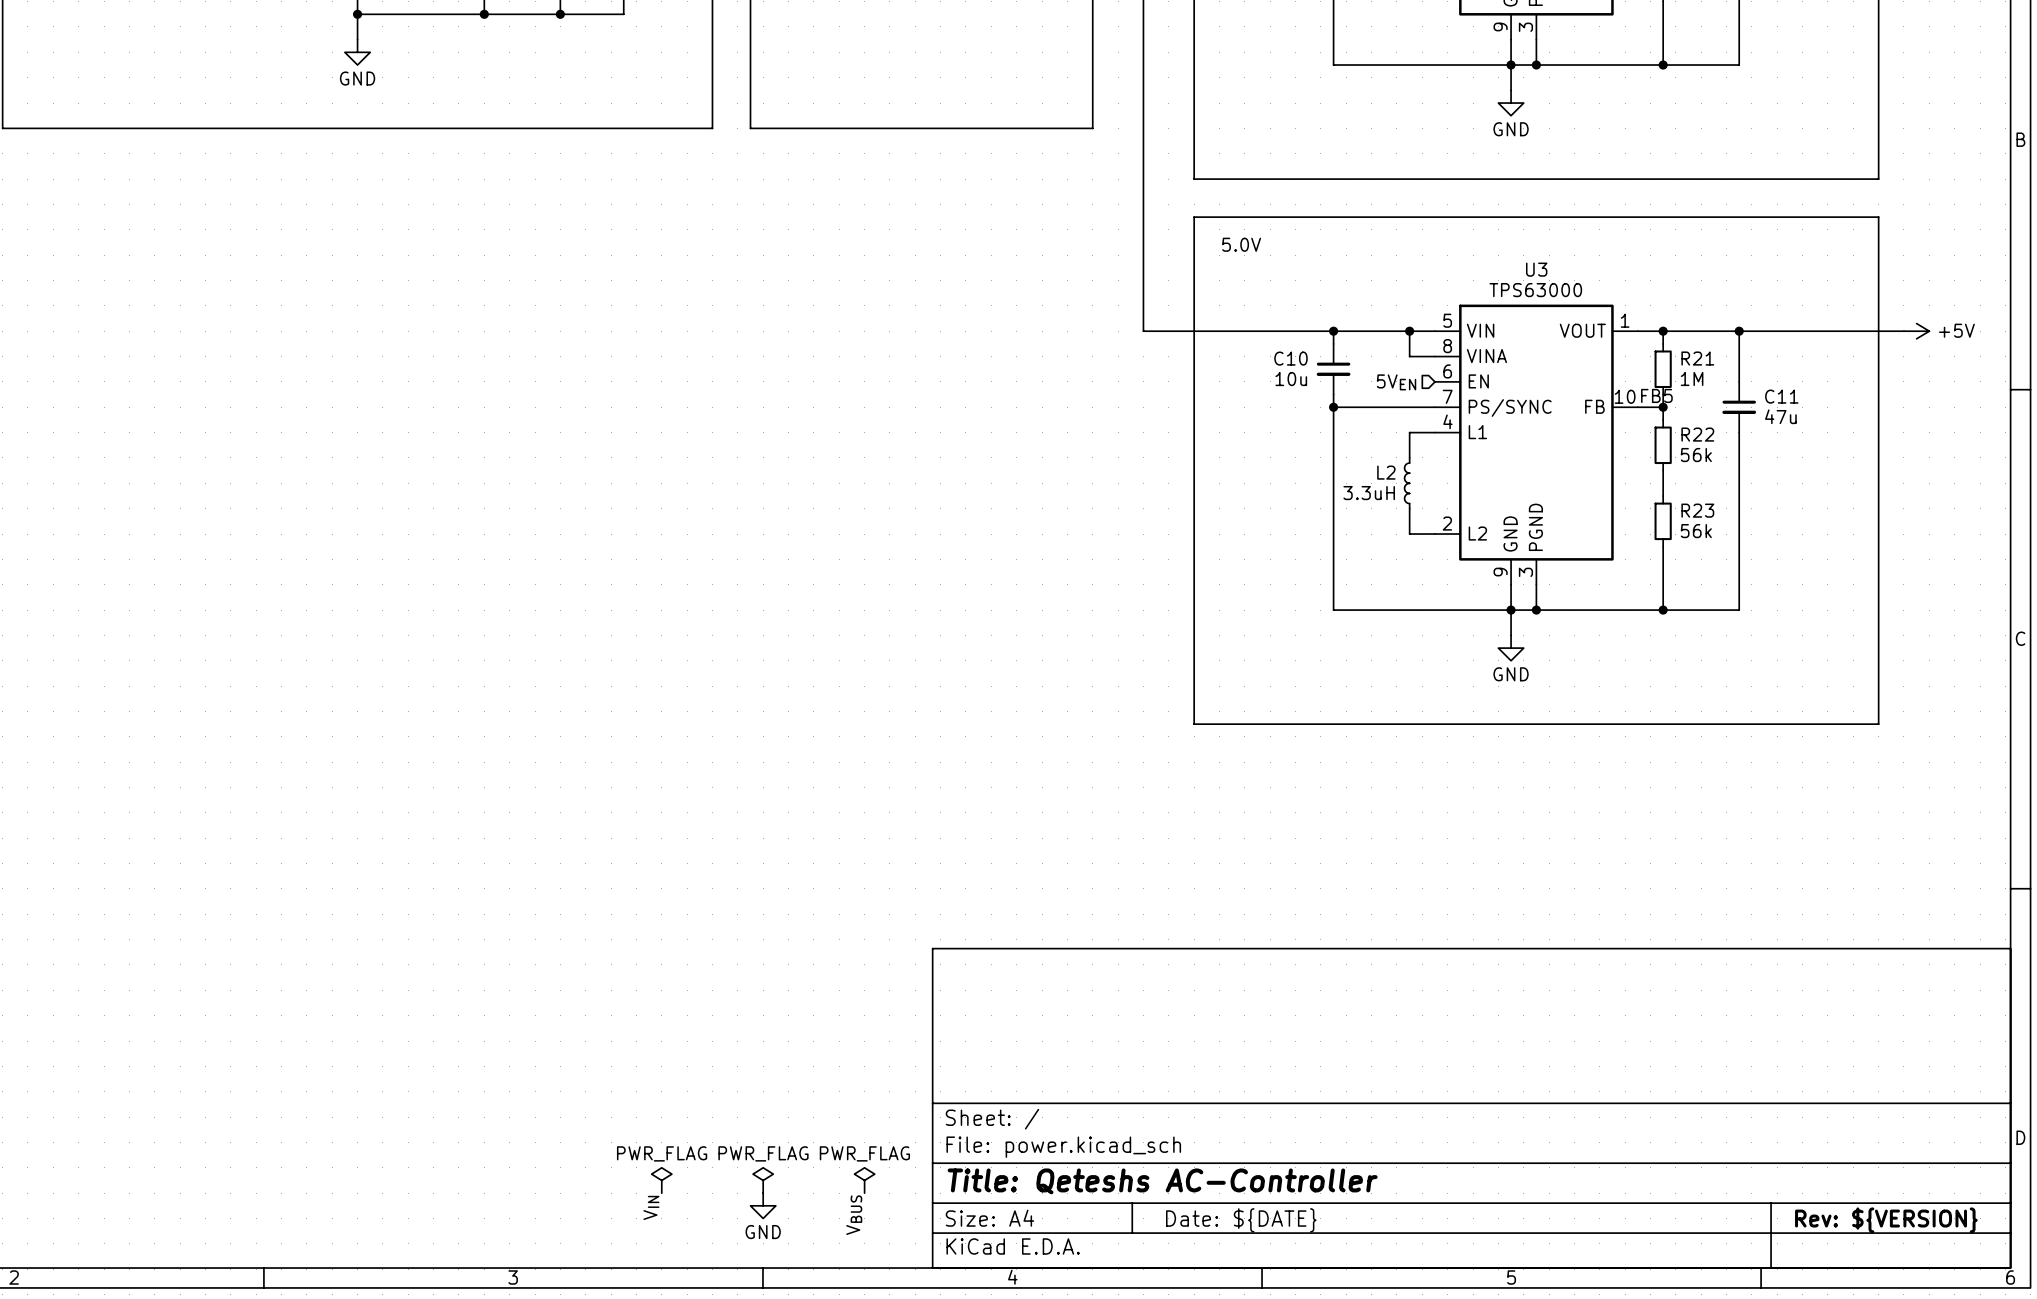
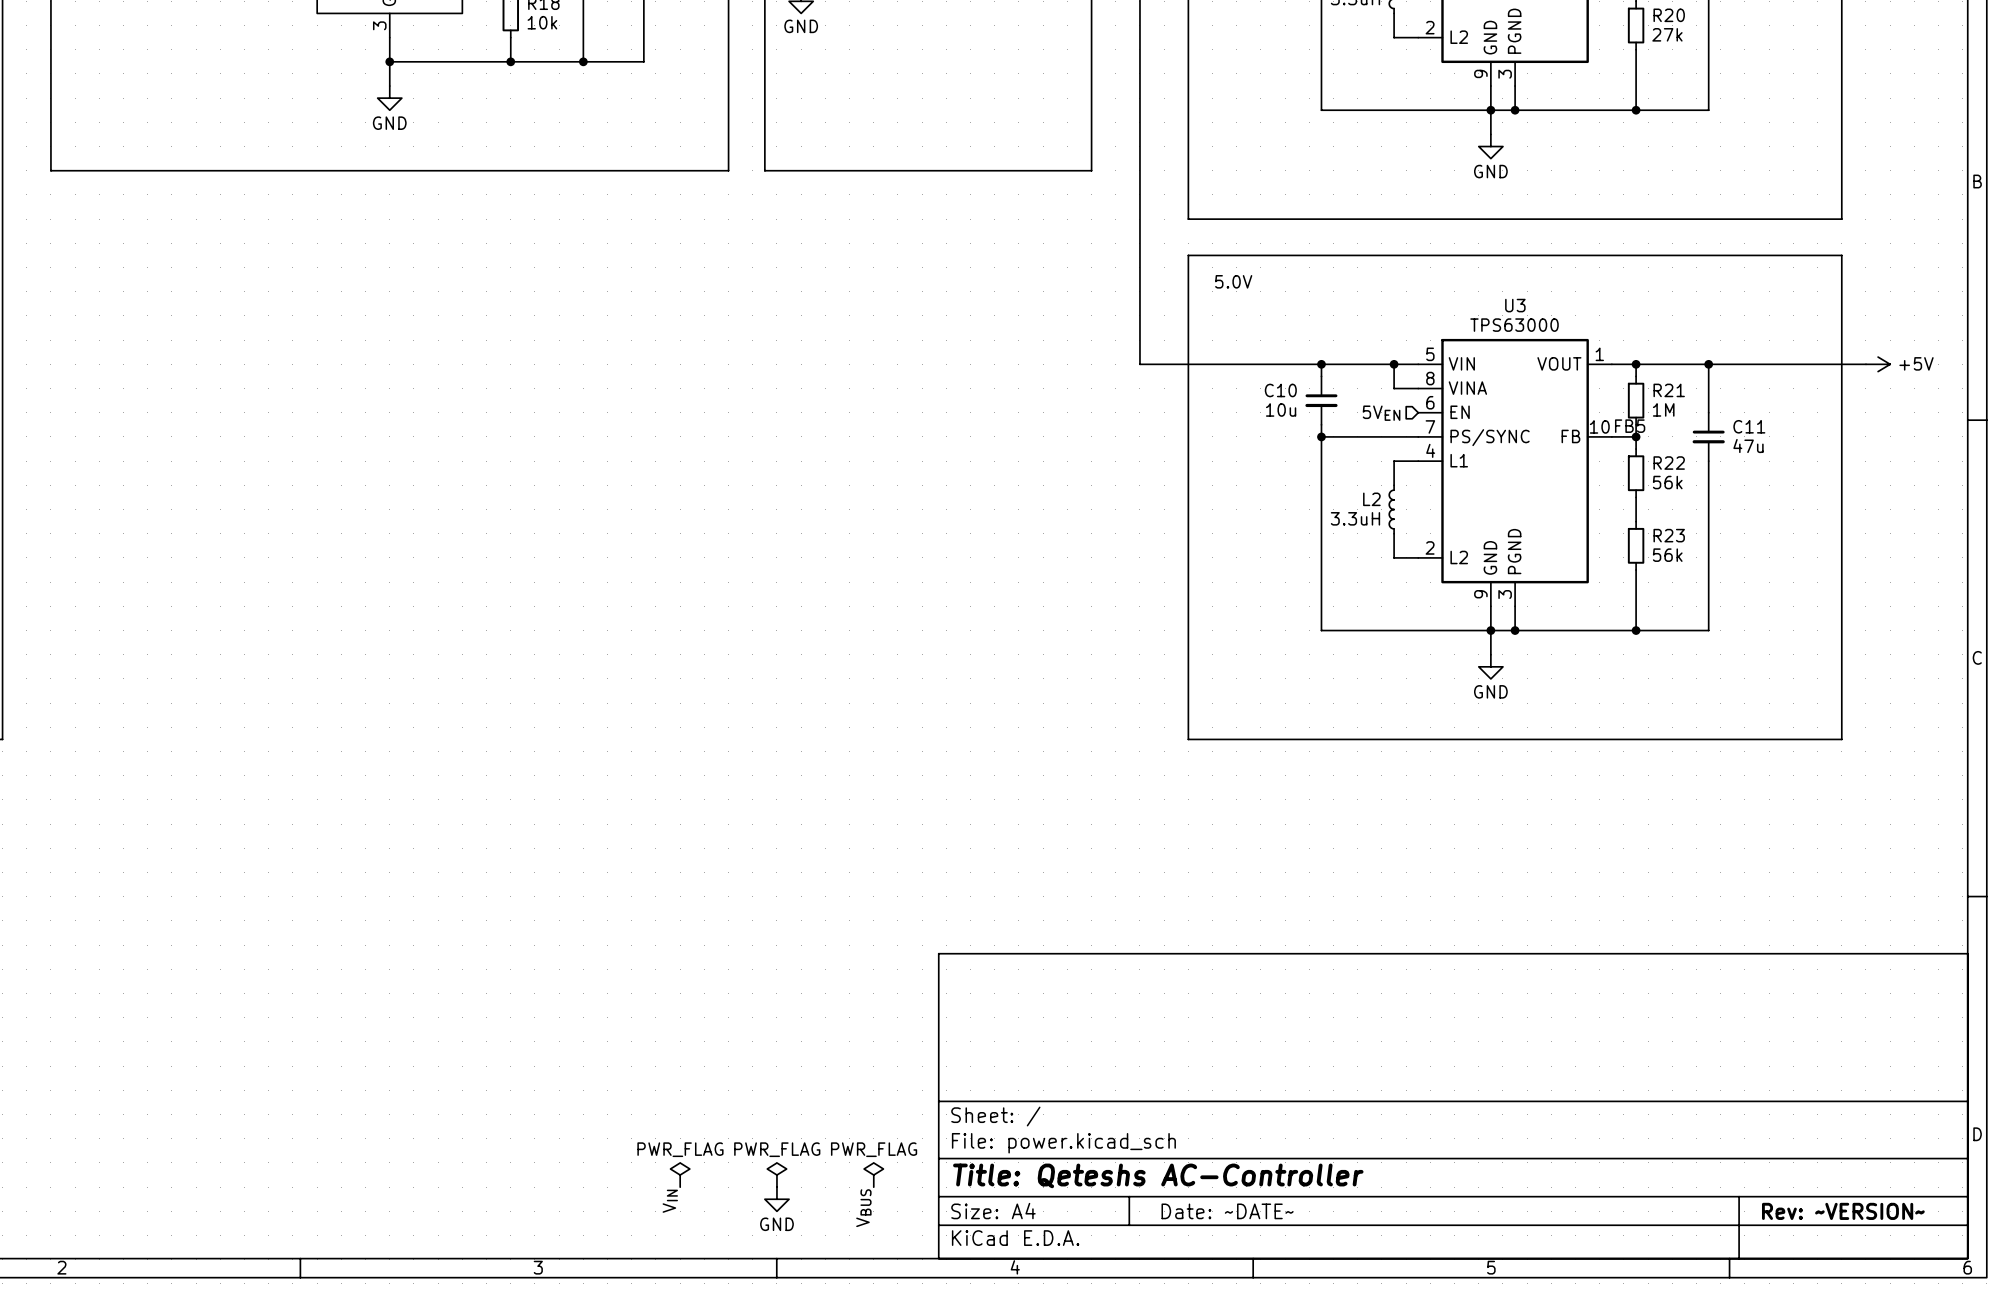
title block: Date: ${DATE} (1241, 1220) -> Date: ~DATE~ (1227, 1211)
title block: Rev: ${VERSION} (1886, 1220) -> Rev: ~VERSION~ (1843, 1211)

